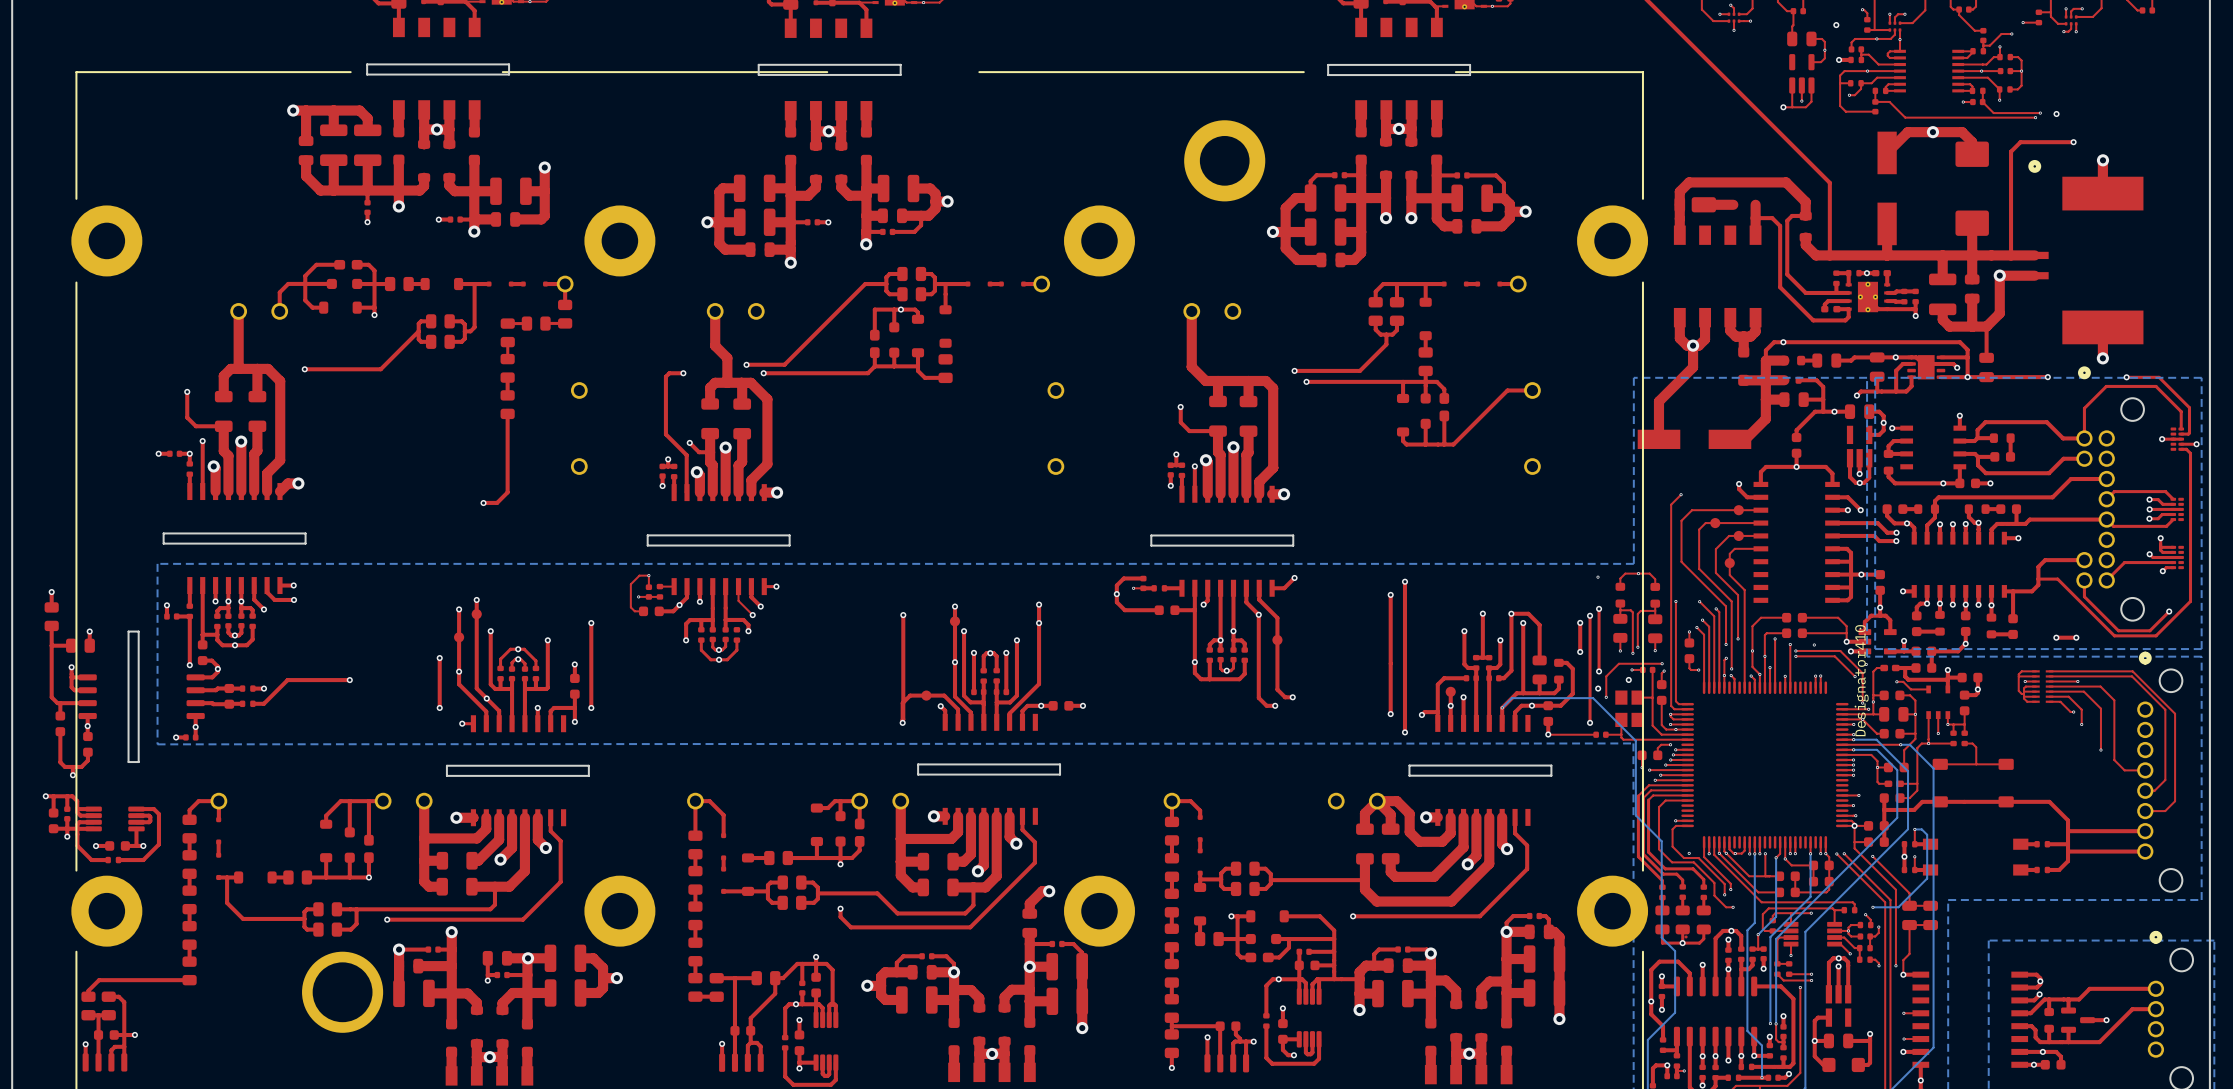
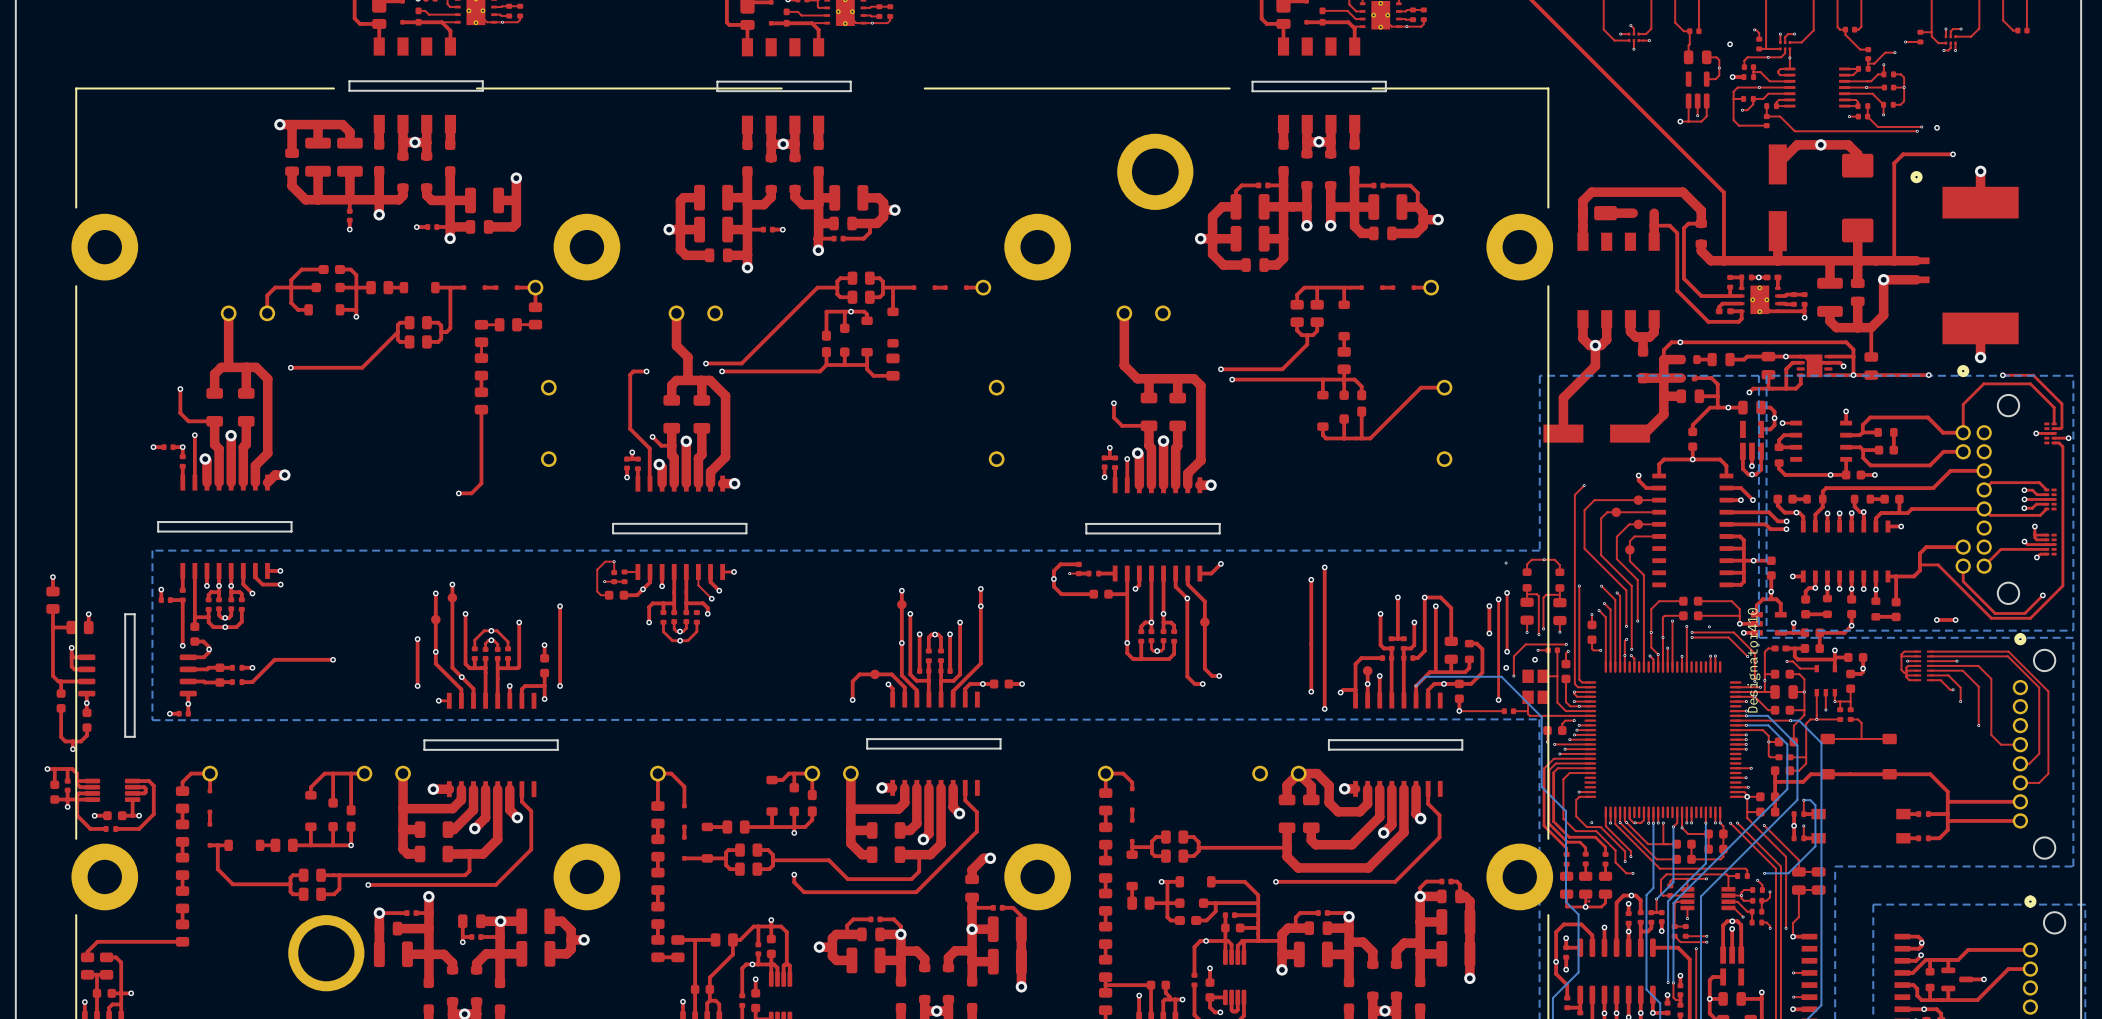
top track: (903, 615) (902, 720) -> none
via: (903, 615) -> none

